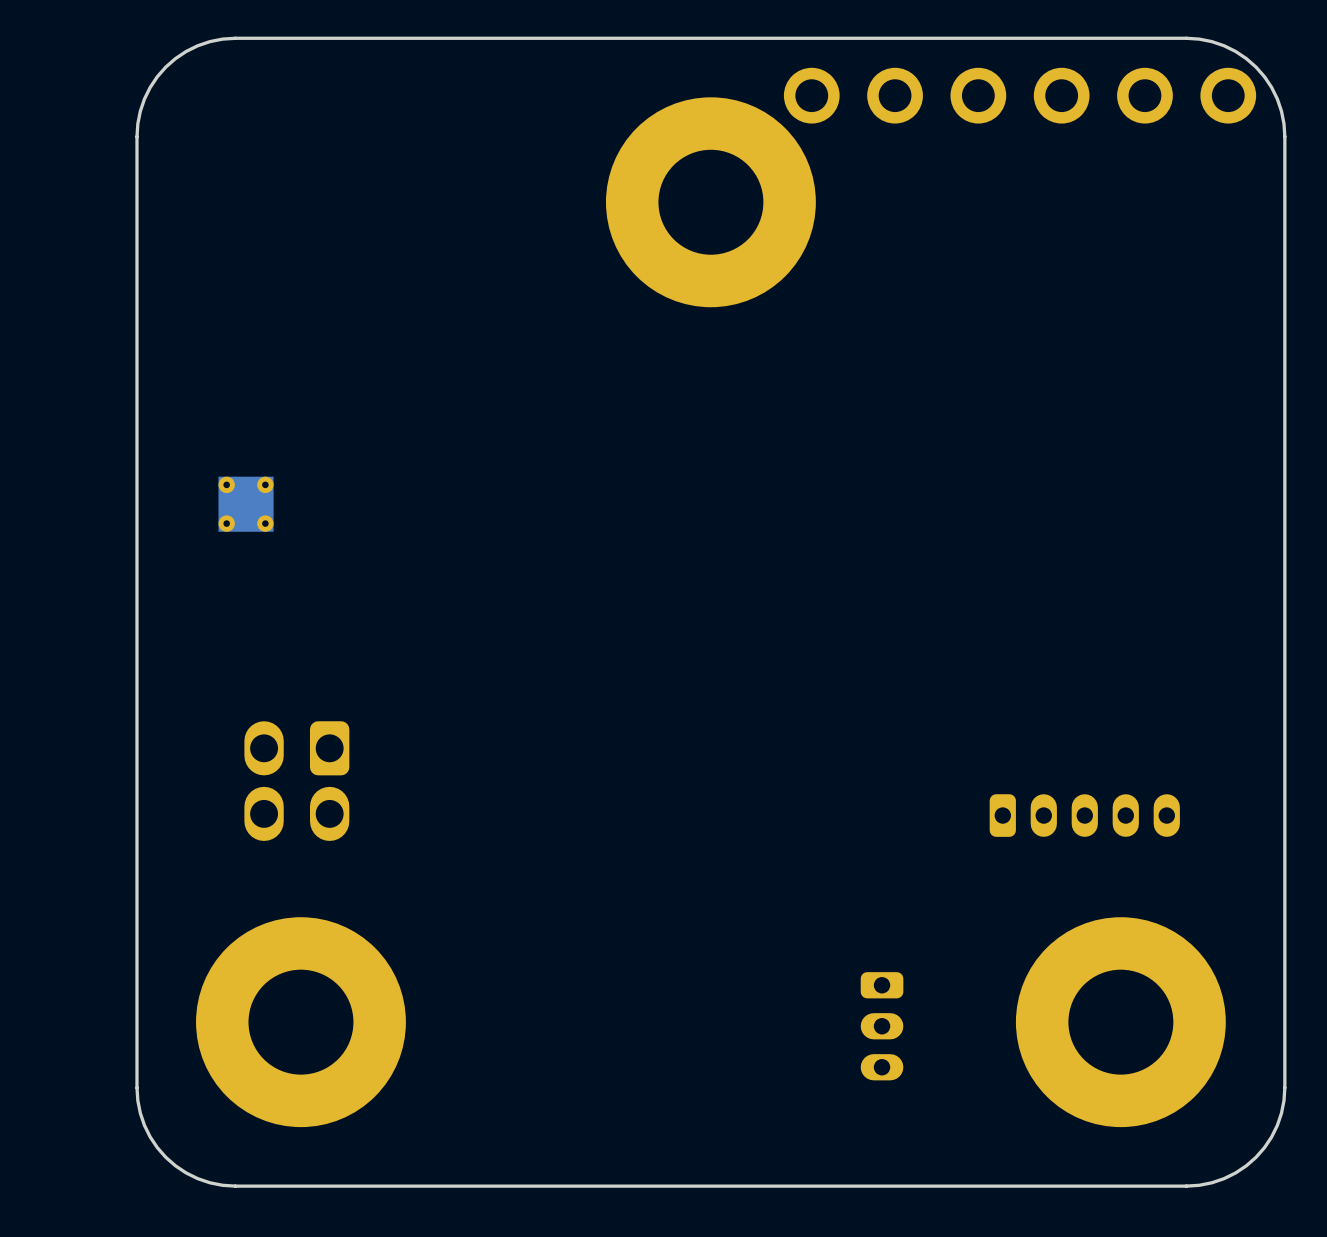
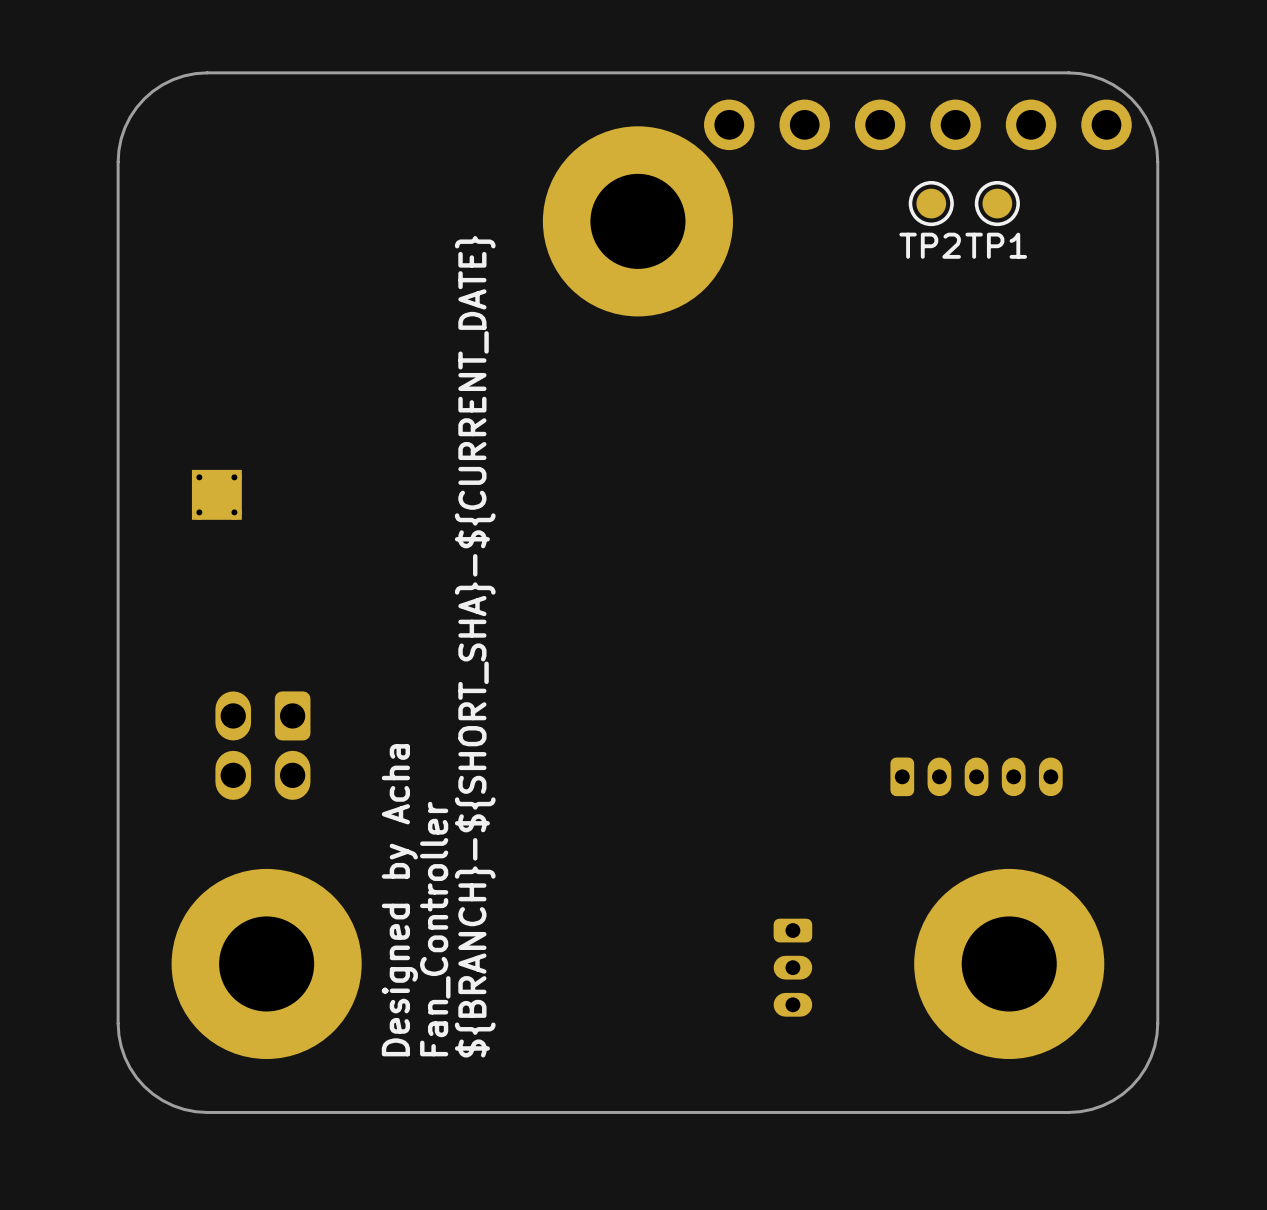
TP2: none -> (931, 203)
TP1: none -> (997, 203)
text: none -> ${BRANCH}-${SHORT_SHA}-${CURRENT_DATE} (475, 646)
text: none -> Designed by Acha (399, 900)
text: none -> Fan_Controller (435, 929)

